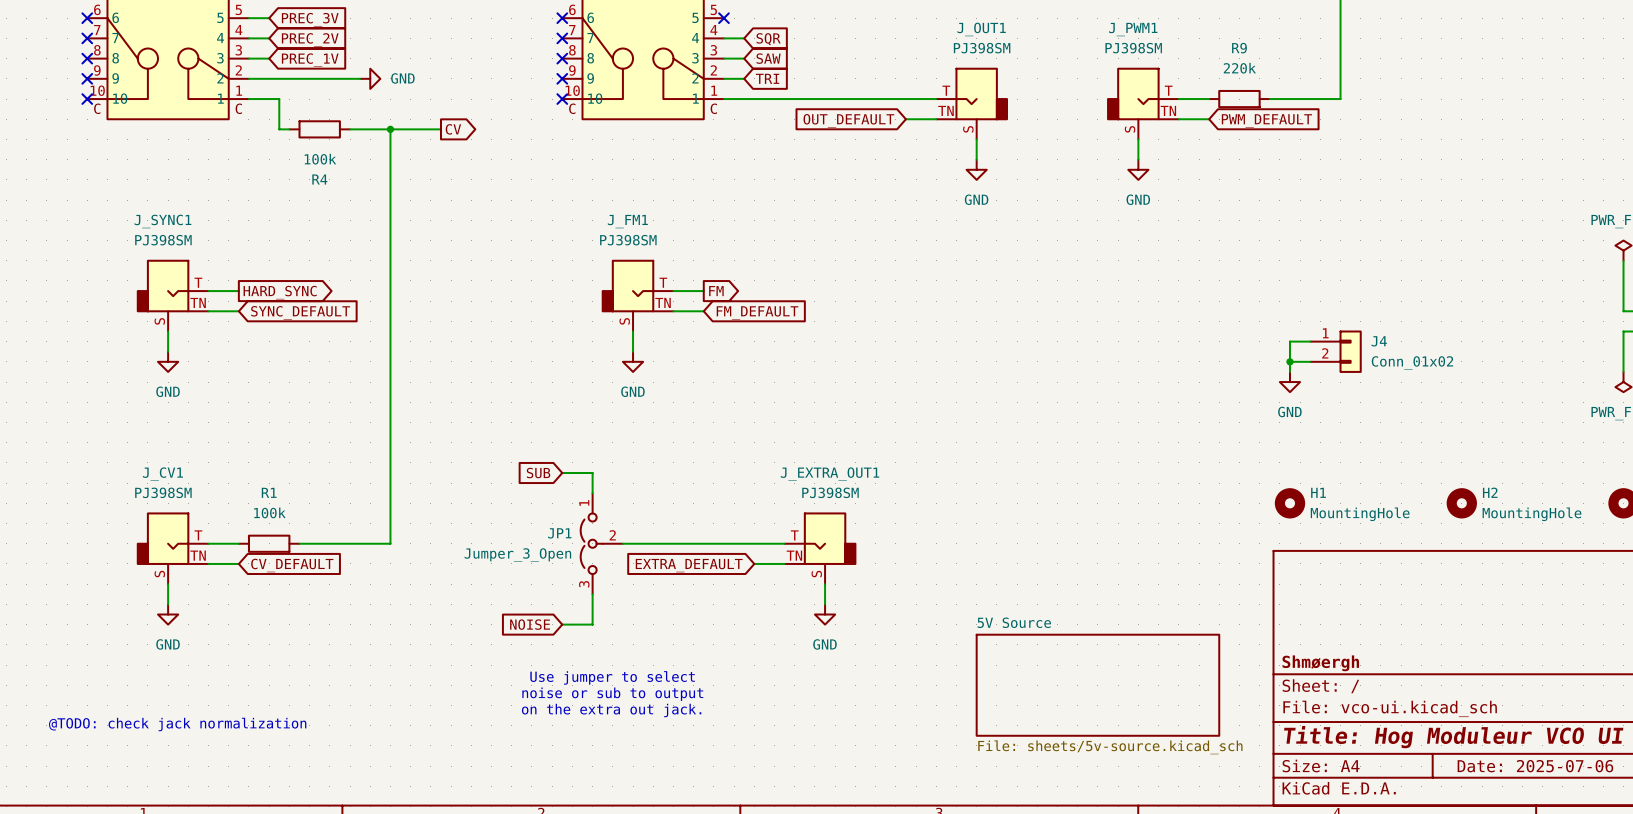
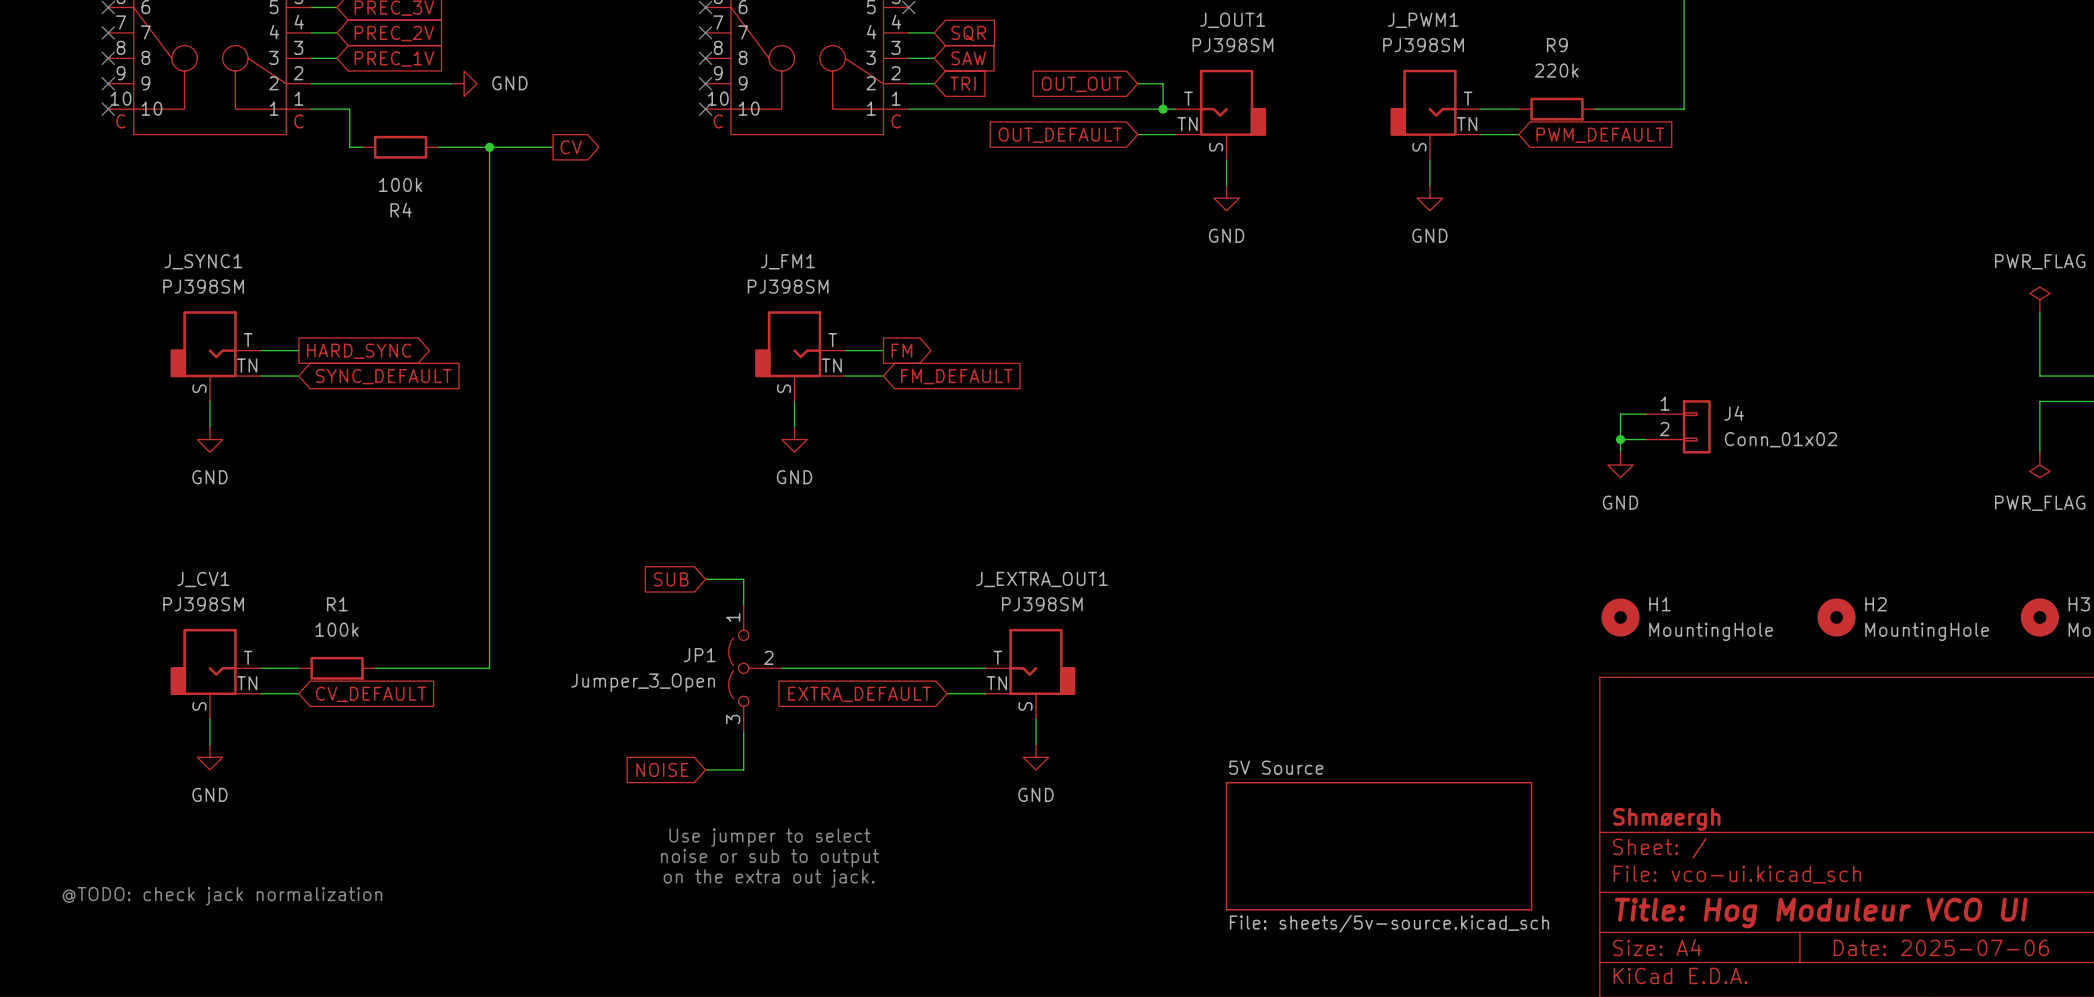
wire: none -> (1137, 83) (1163, 83) (1163, 109)
global label: none -> OUT_OUT (1081, 84)
junction: none -> (1163, 109)

